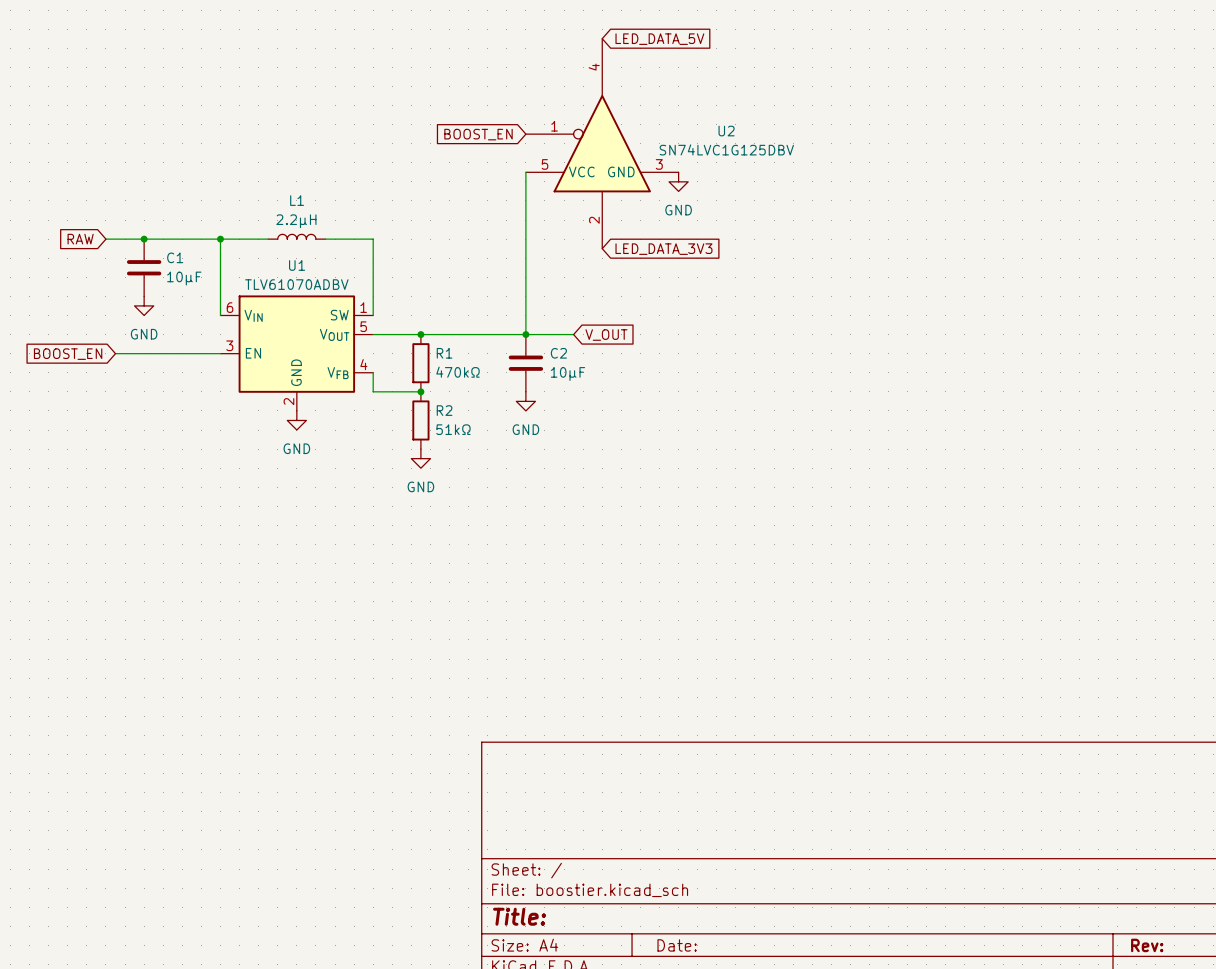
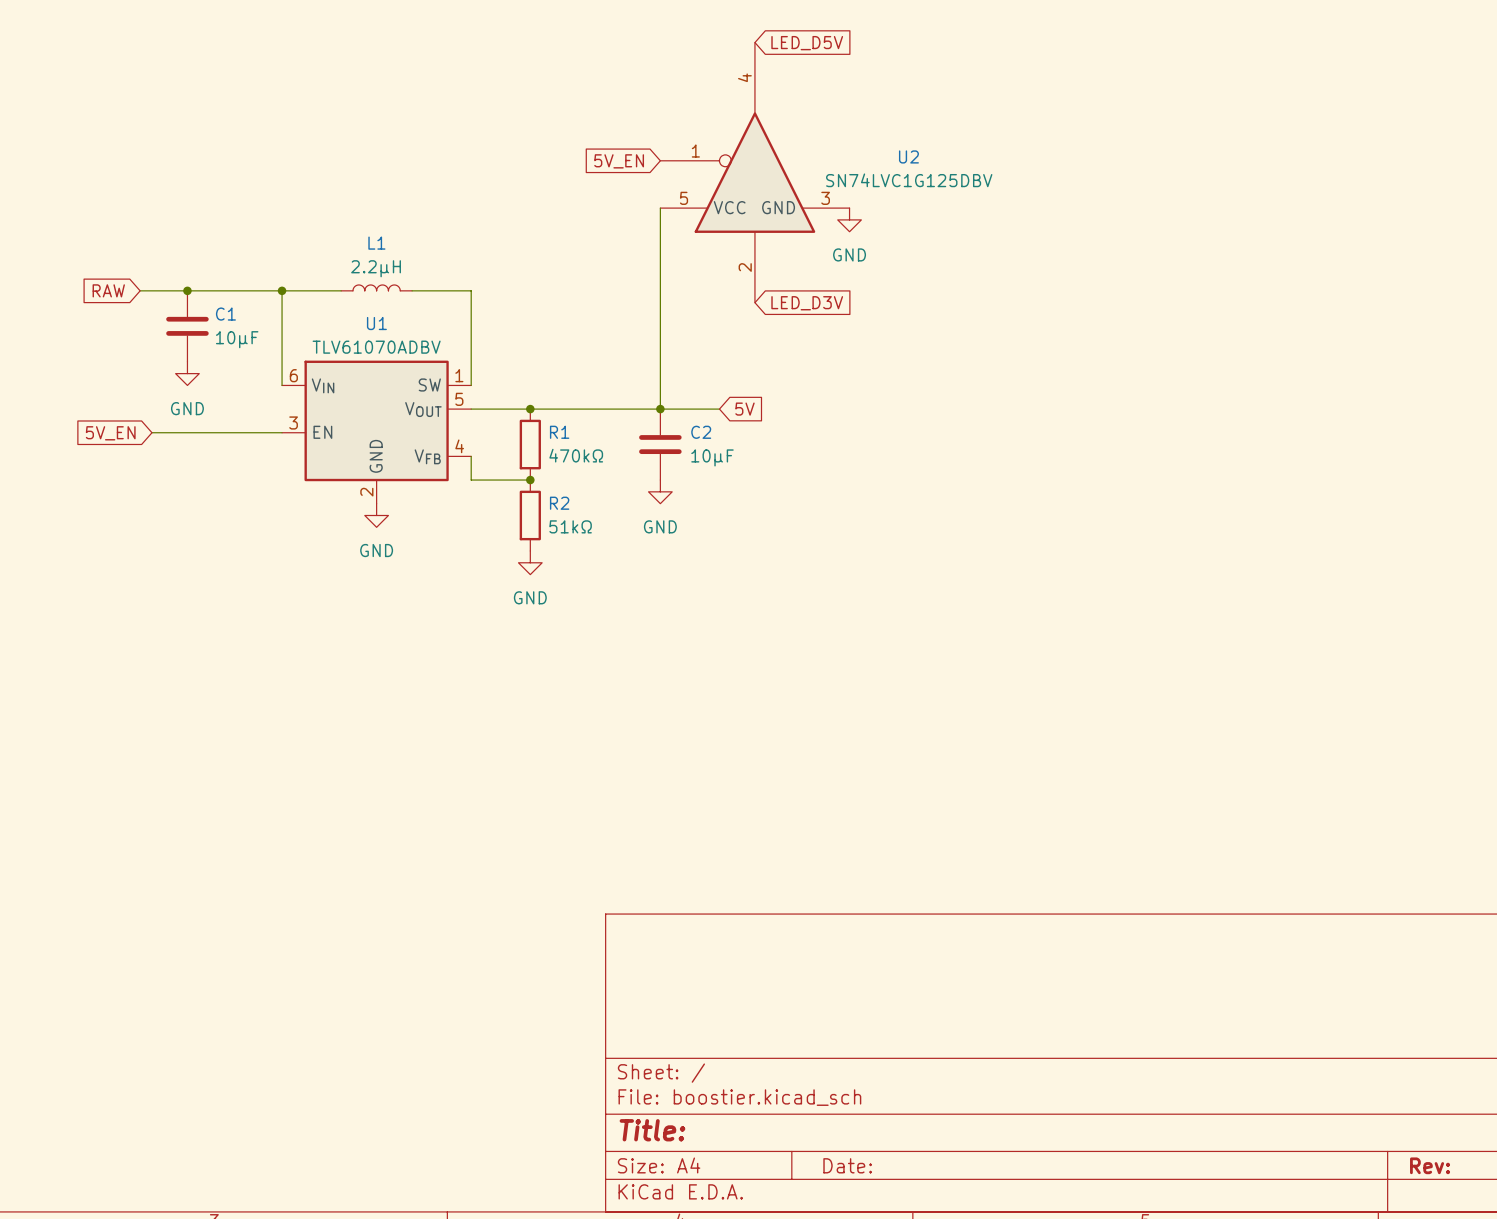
global label: LED_DATA_5V (659, 39) -> LED_D5V (807, 43)
global label: BOOST_EN (478, 134) -> 5V_EN (619, 161)
global label: LED_DATA_3V3 (663, 249) -> LED_D3V (807, 303)
global label: V_OUT (606, 335) -> 5V (744, 409)
global label: BOOST_EN (68, 354) -> 5V_EN (110, 433)

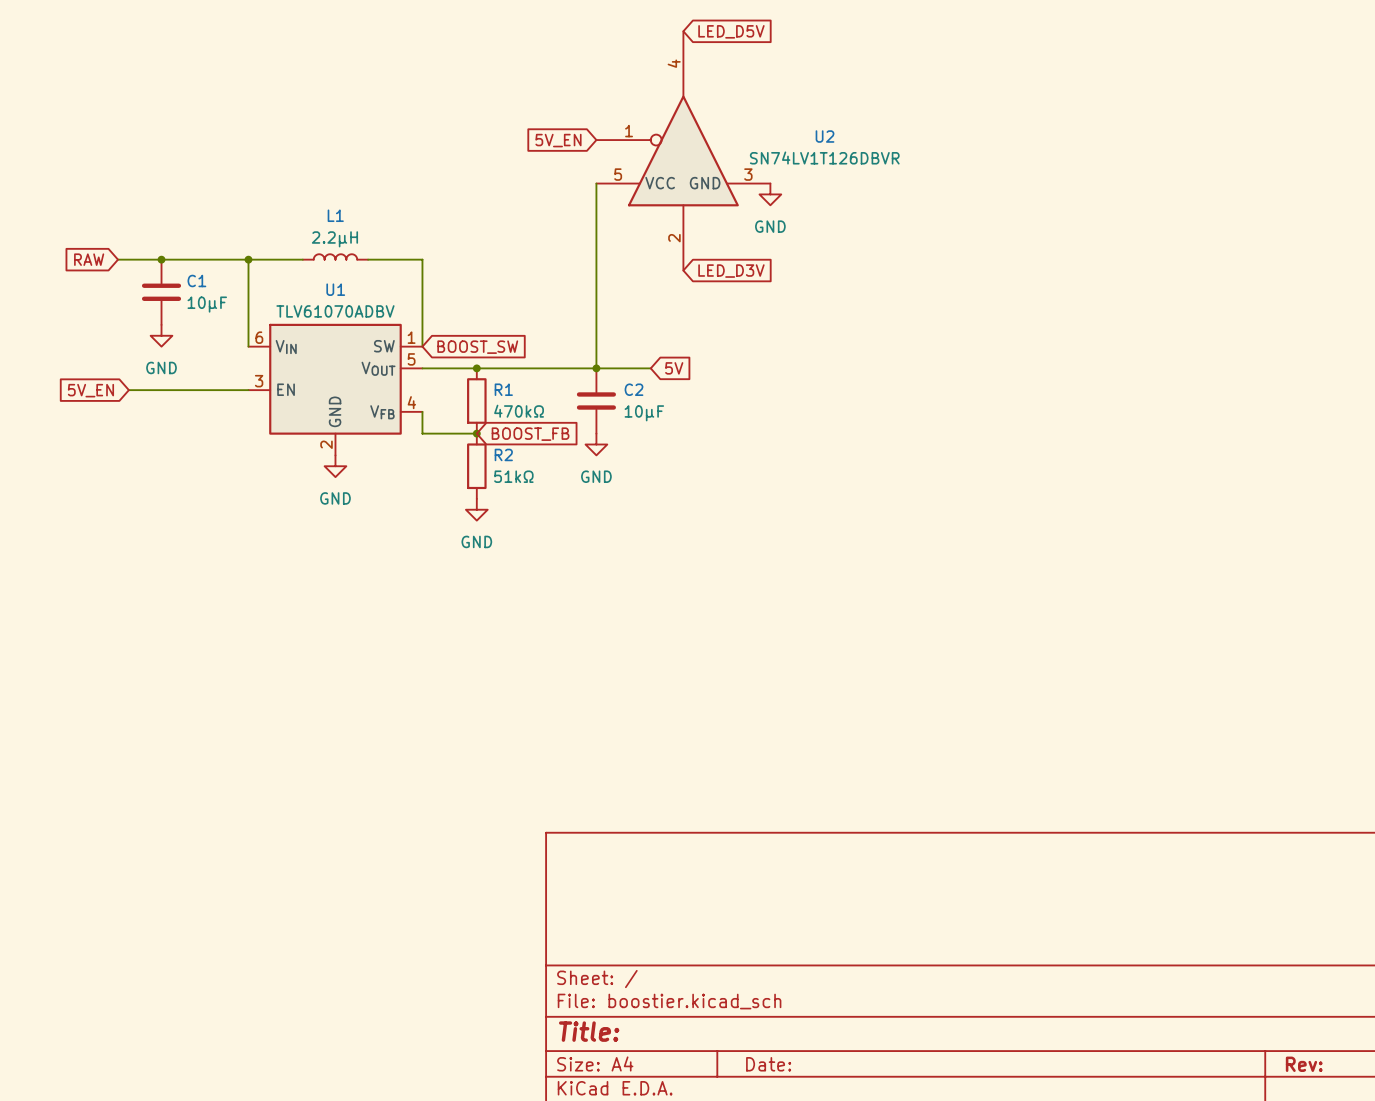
U2 value: SN74LVC1G125DBV (909, 180) -> SN74LV1T126DBVR (824, 158)
global label: none -> BOOST_SW (477, 347)
global label: none -> BOOST_FB (530, 434)

